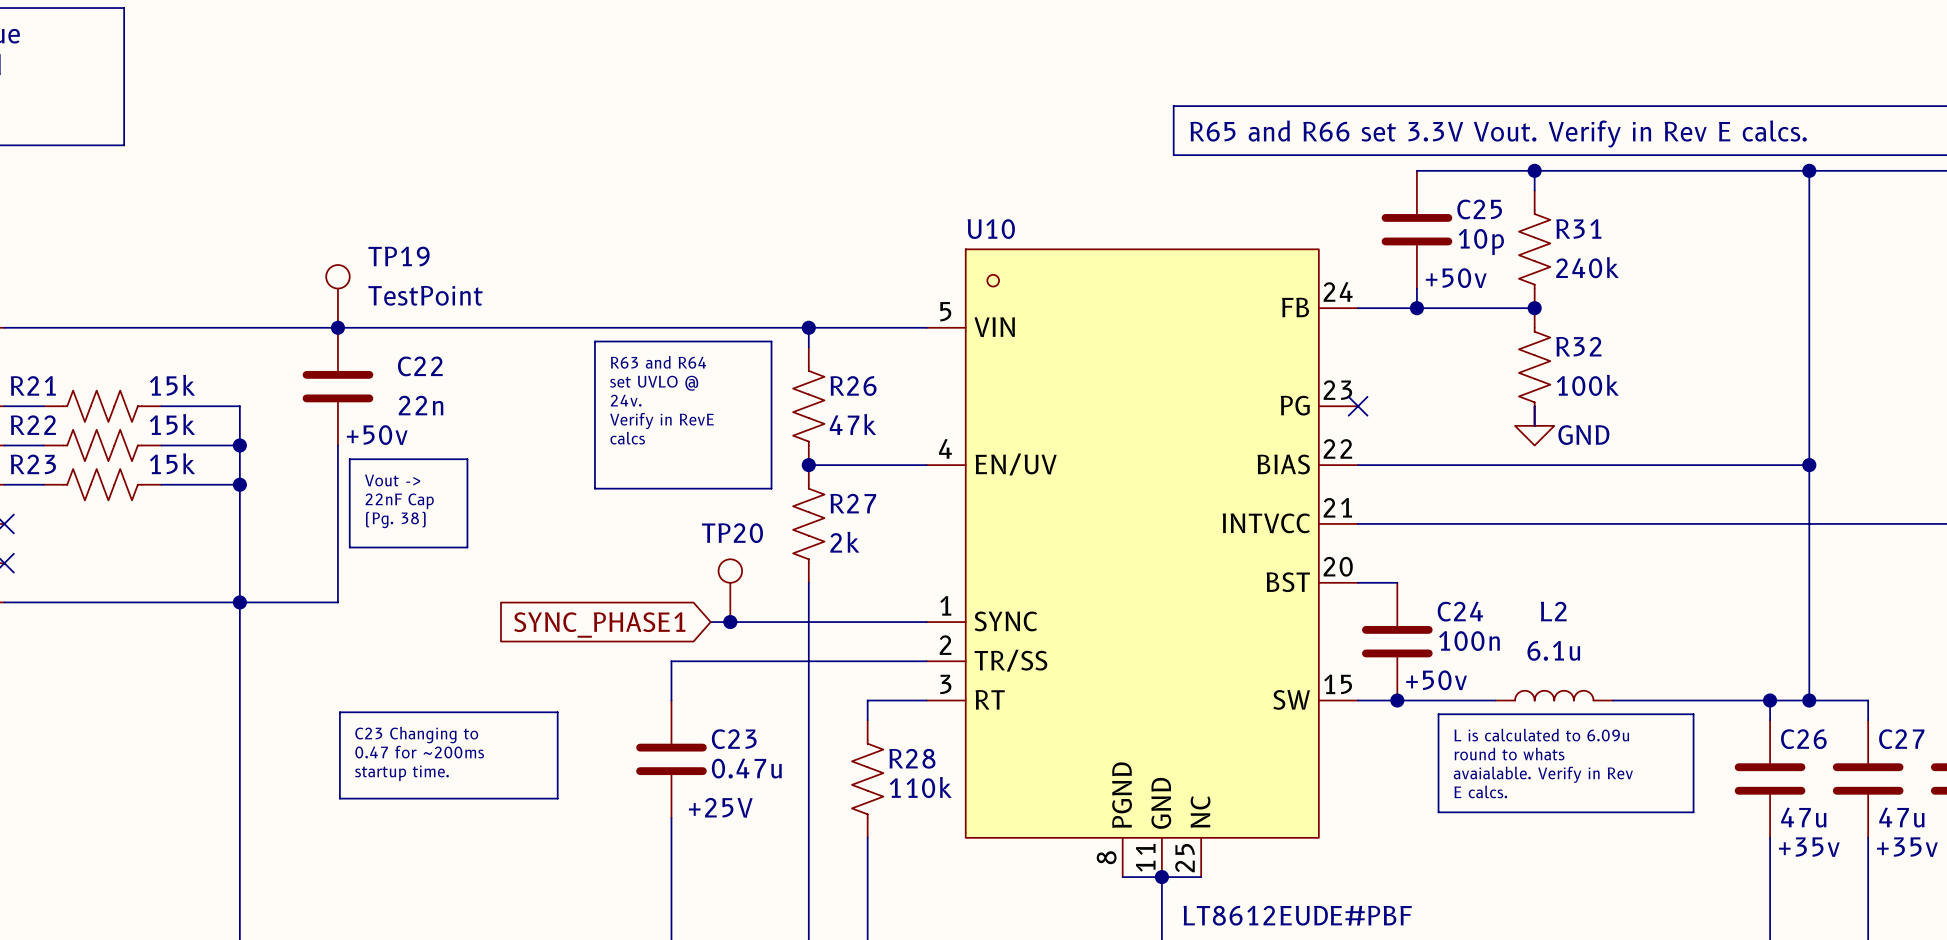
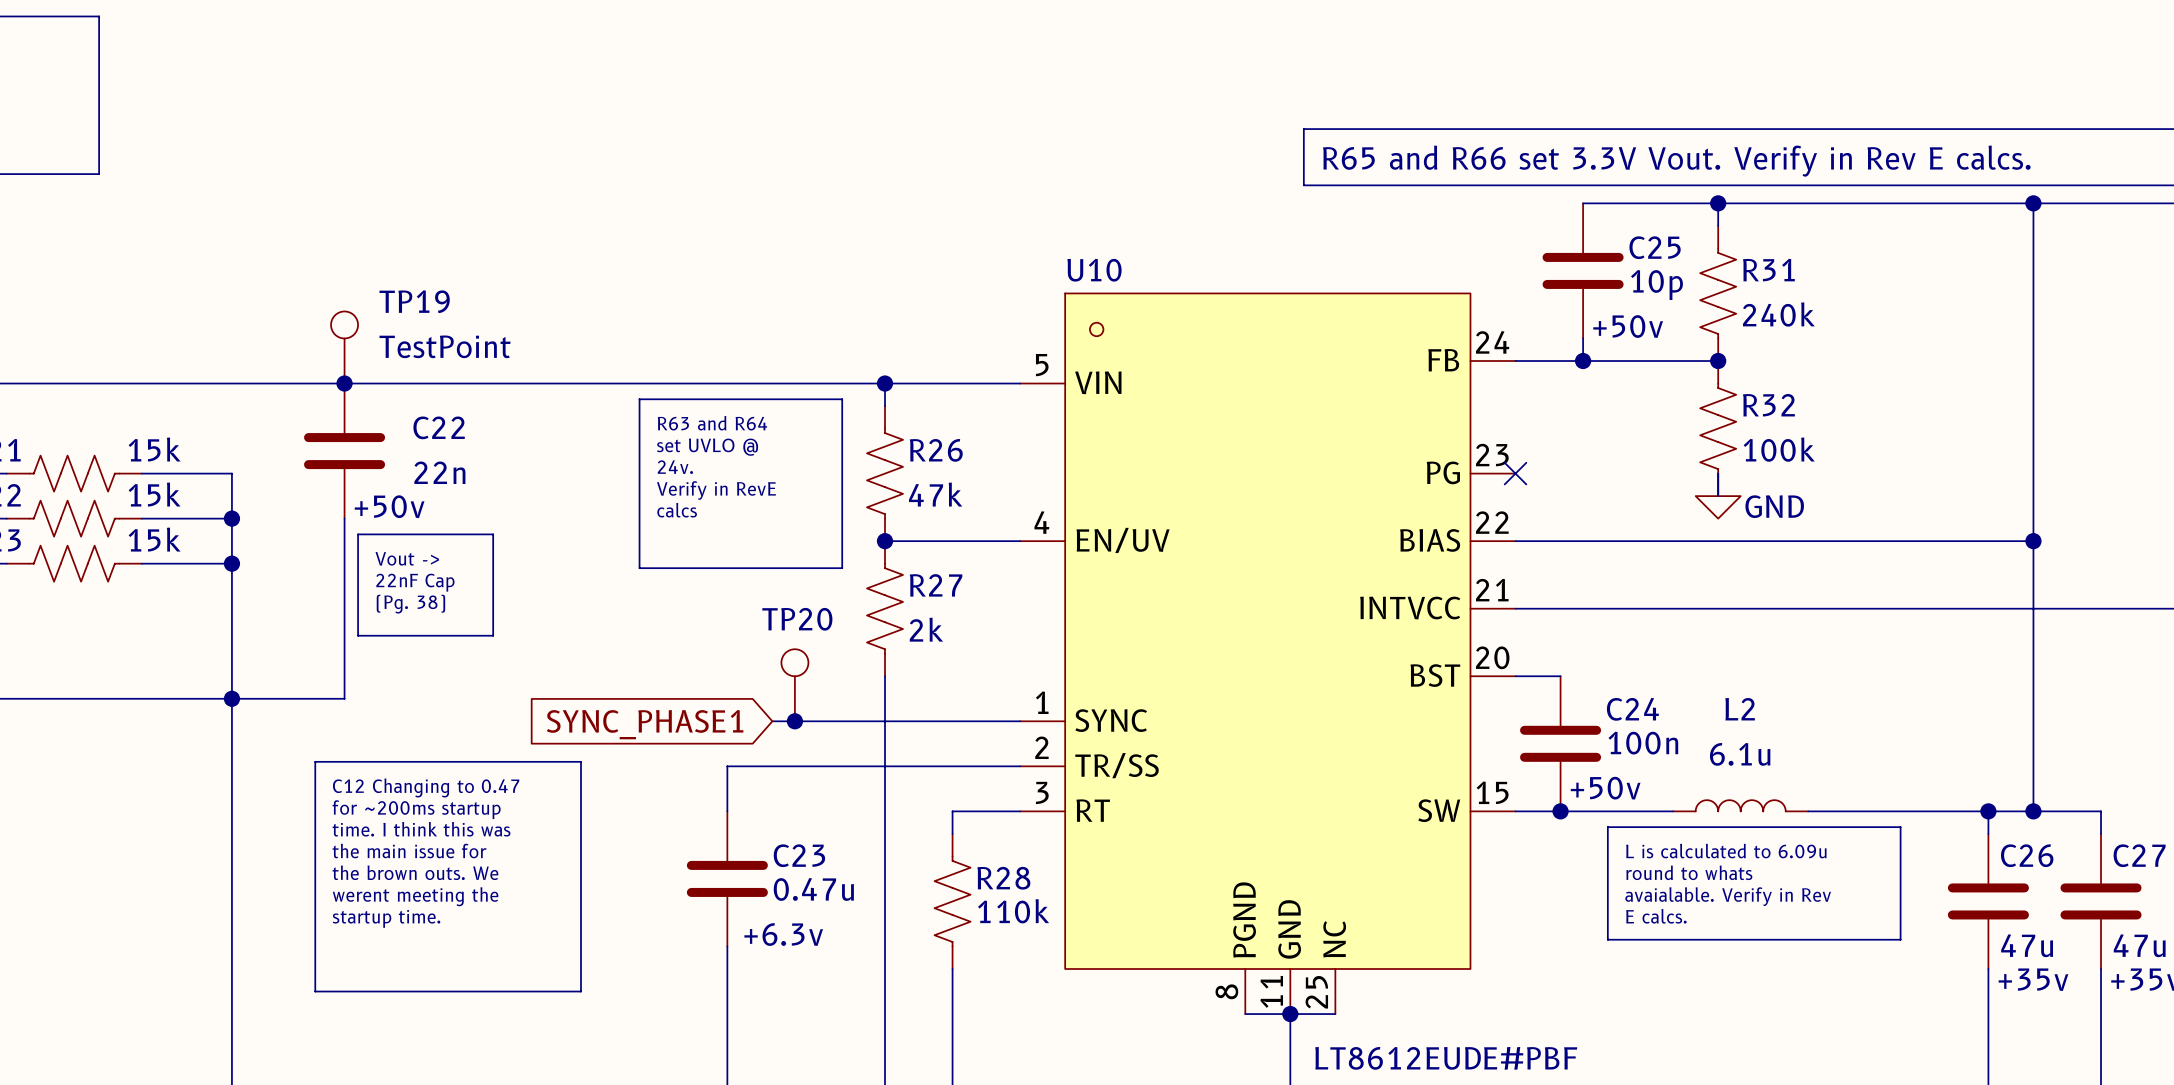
line: none -> (315, 761) (580, 761) (580, 991) (315, 991) (315, 761)
text: none -> C12 Changing to 0.47 (426, 787)
text: none -> for ~200ms startup (416, 809)
line: (339, 712) (557, 712) (557, 798) (339, 798) (339, 712) -> none
text: none -> time. I think this was (421, 829)
text: none -> the main issue for (409, 851)
text: C23 Changing to (416, 735) -> none
text: 0.47 for ~200ms (419, 752) -> none
text: none -> the brown outs. We (415, 872)
text position: startup time. (401, 773) -> startup time. (386, 918)
text: none -> werent meeting the (415, 896)
C23 text: +25V (720, 807) -> +6.3v (783, 934)

